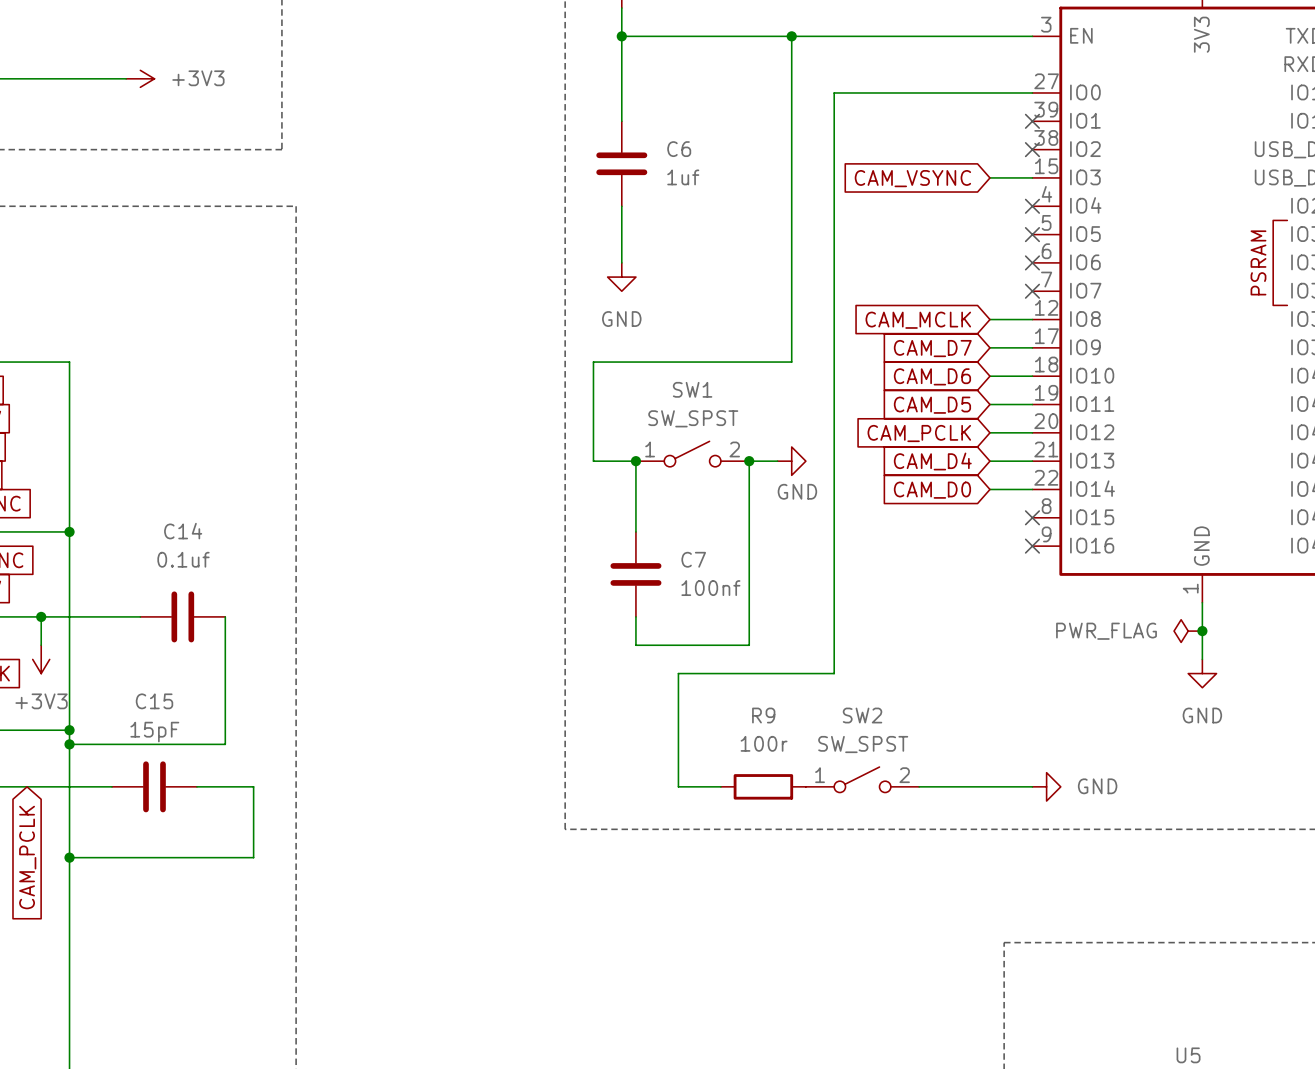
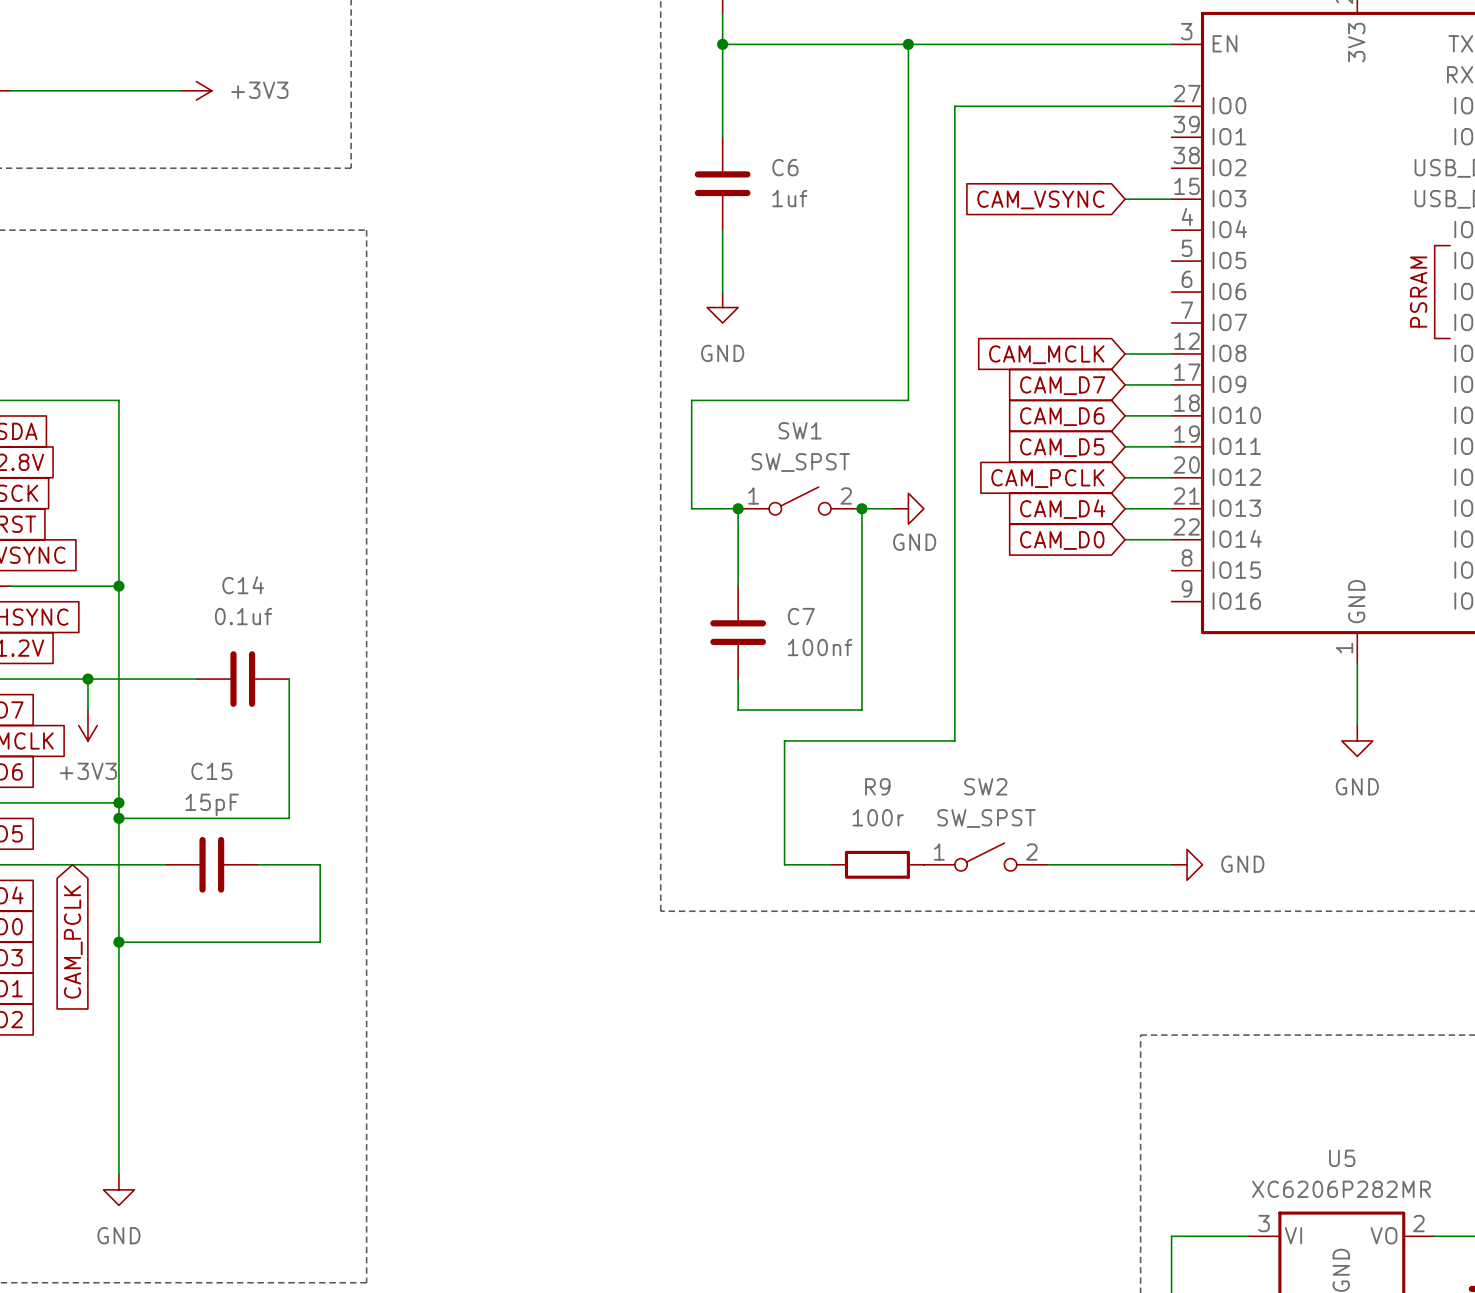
no-connect mark: (1032, 121) -> none
no-connect mark: (1032, 149) -> none
no-connect mark: (1032, 206) -> none
no-connect mark: (1032, 234) -> none
no-connect mark: (1032, 262) -> none
no-connect mark: (1032, 291) -> none
no-connect mark: (1032, 517) -> none
no-connect mark: (1032, 546) -> none
power symbol: PWR_FLAG (1188, 631) -> none
junction: (1202, 631) -> none

